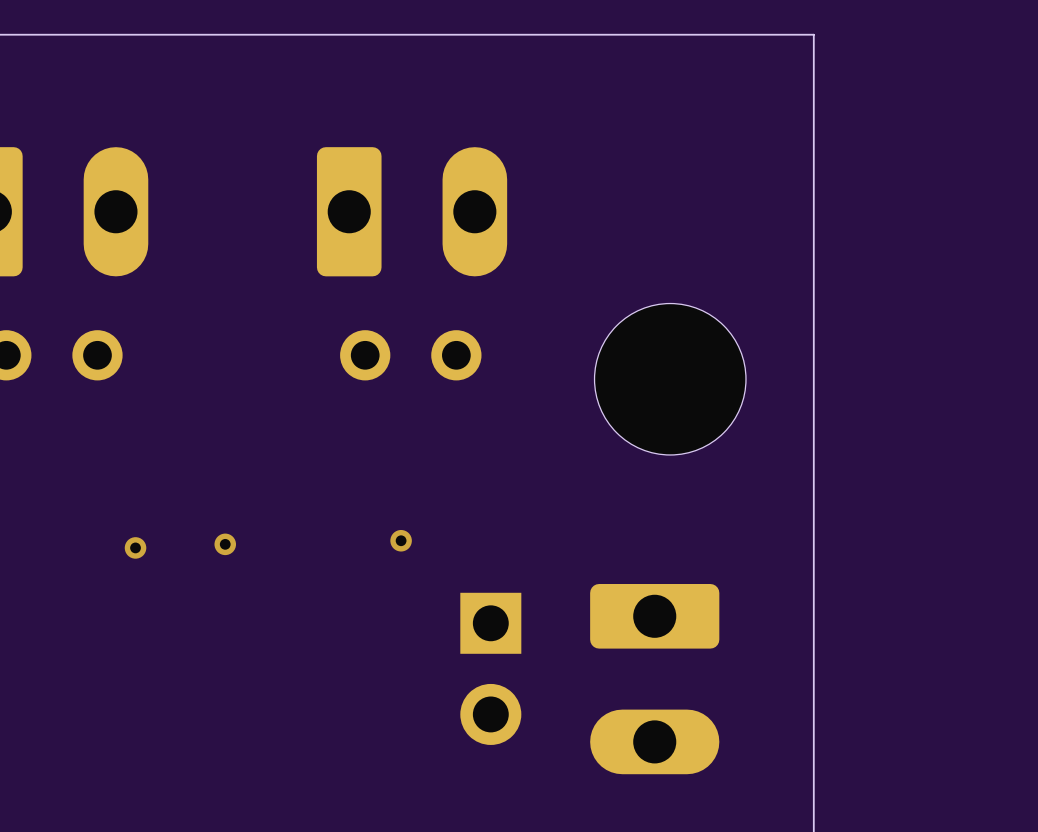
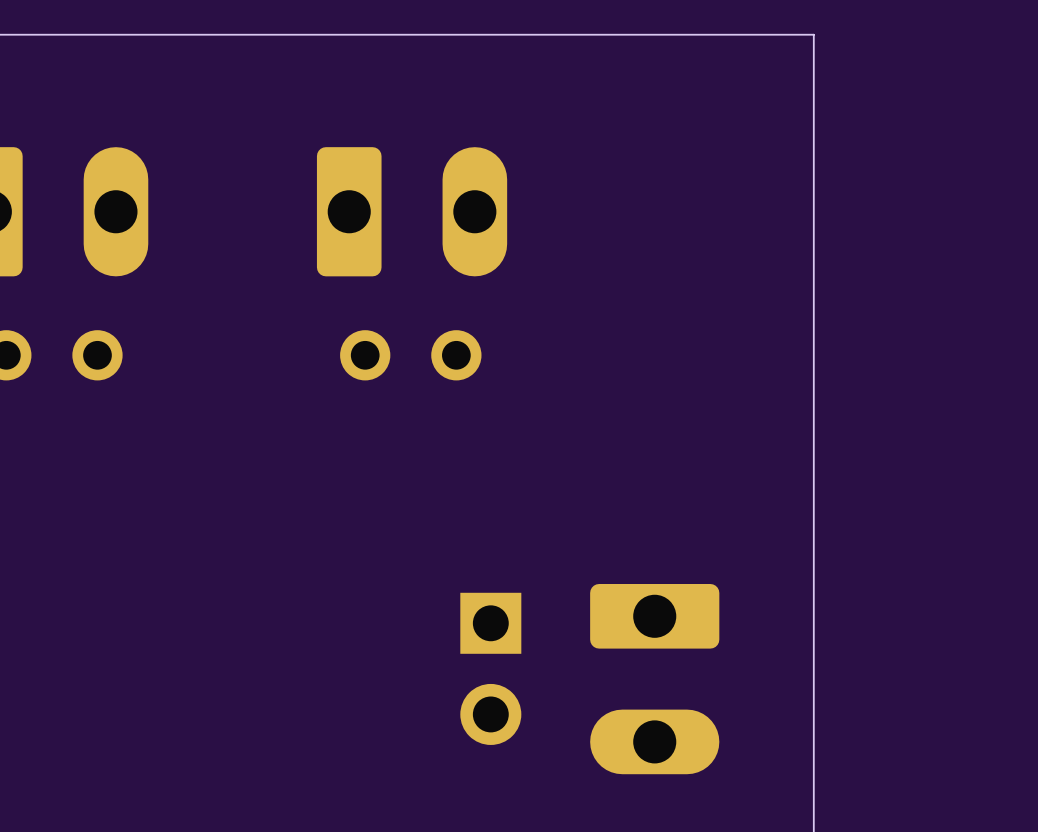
part: (670, 379) -> none
via: (401, 540) -> none
via: (225, 544) -> none
via: (135, 547) -> none

